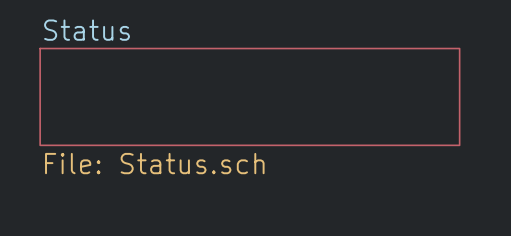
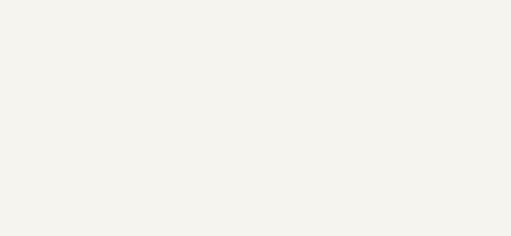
sheet Status: File: Status.sch (249, 96) -> none

